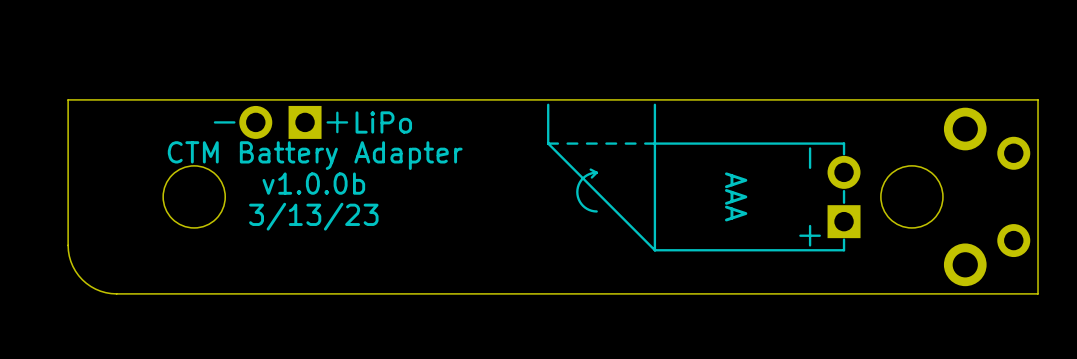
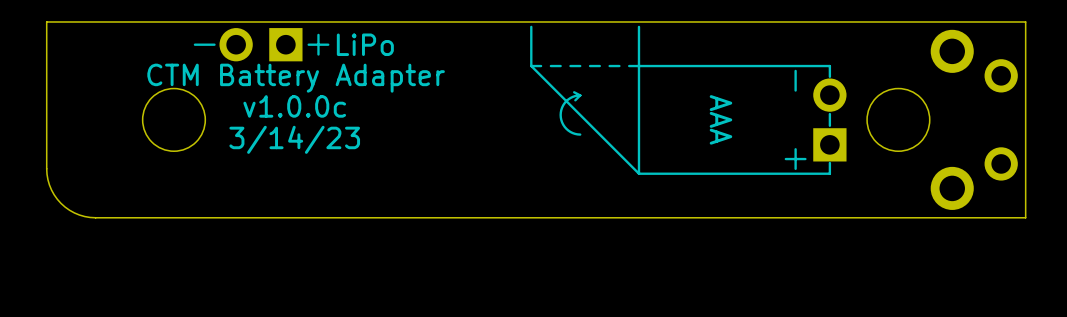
text: v1.0.0b (313, 183) -> v1.0.0c (294, 106)
text: 3/13/23 (313, 216) -> 3/14/23 (294, 139)

